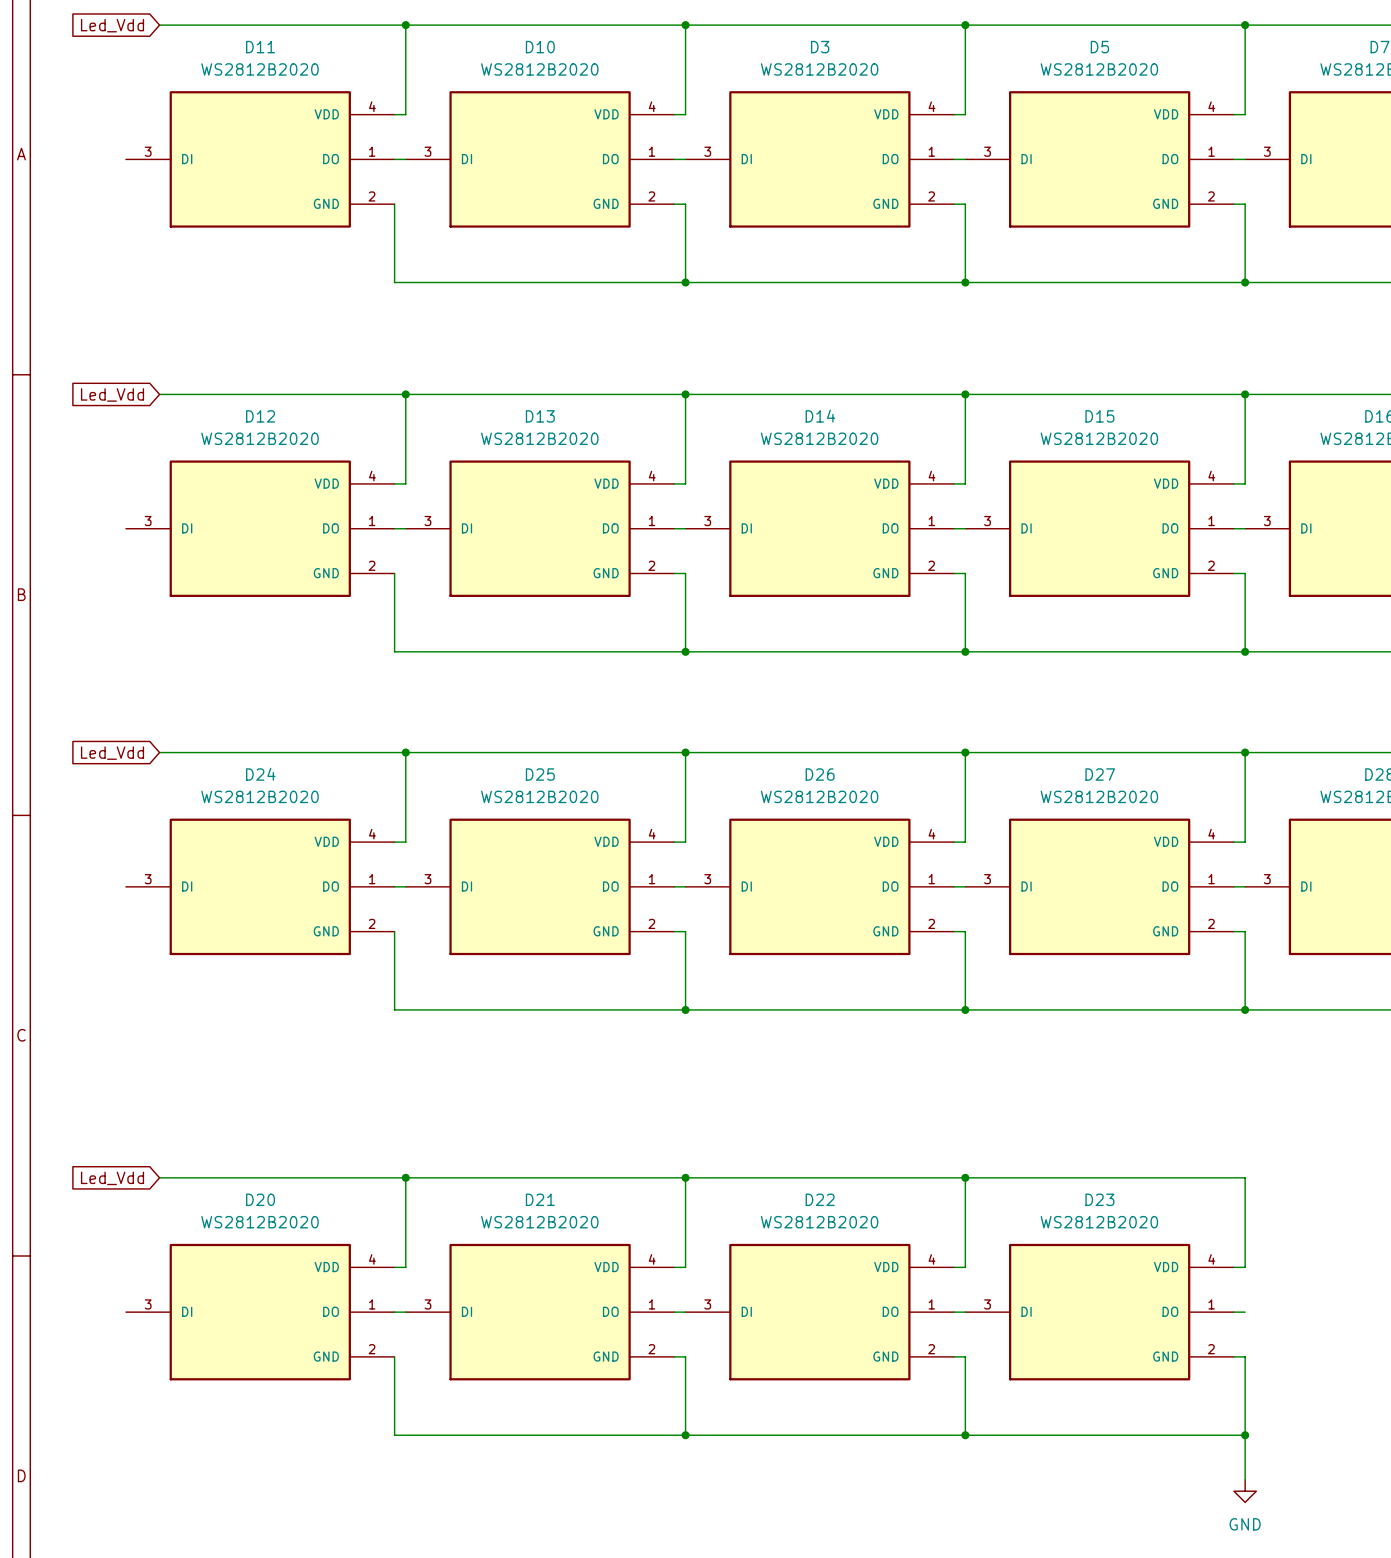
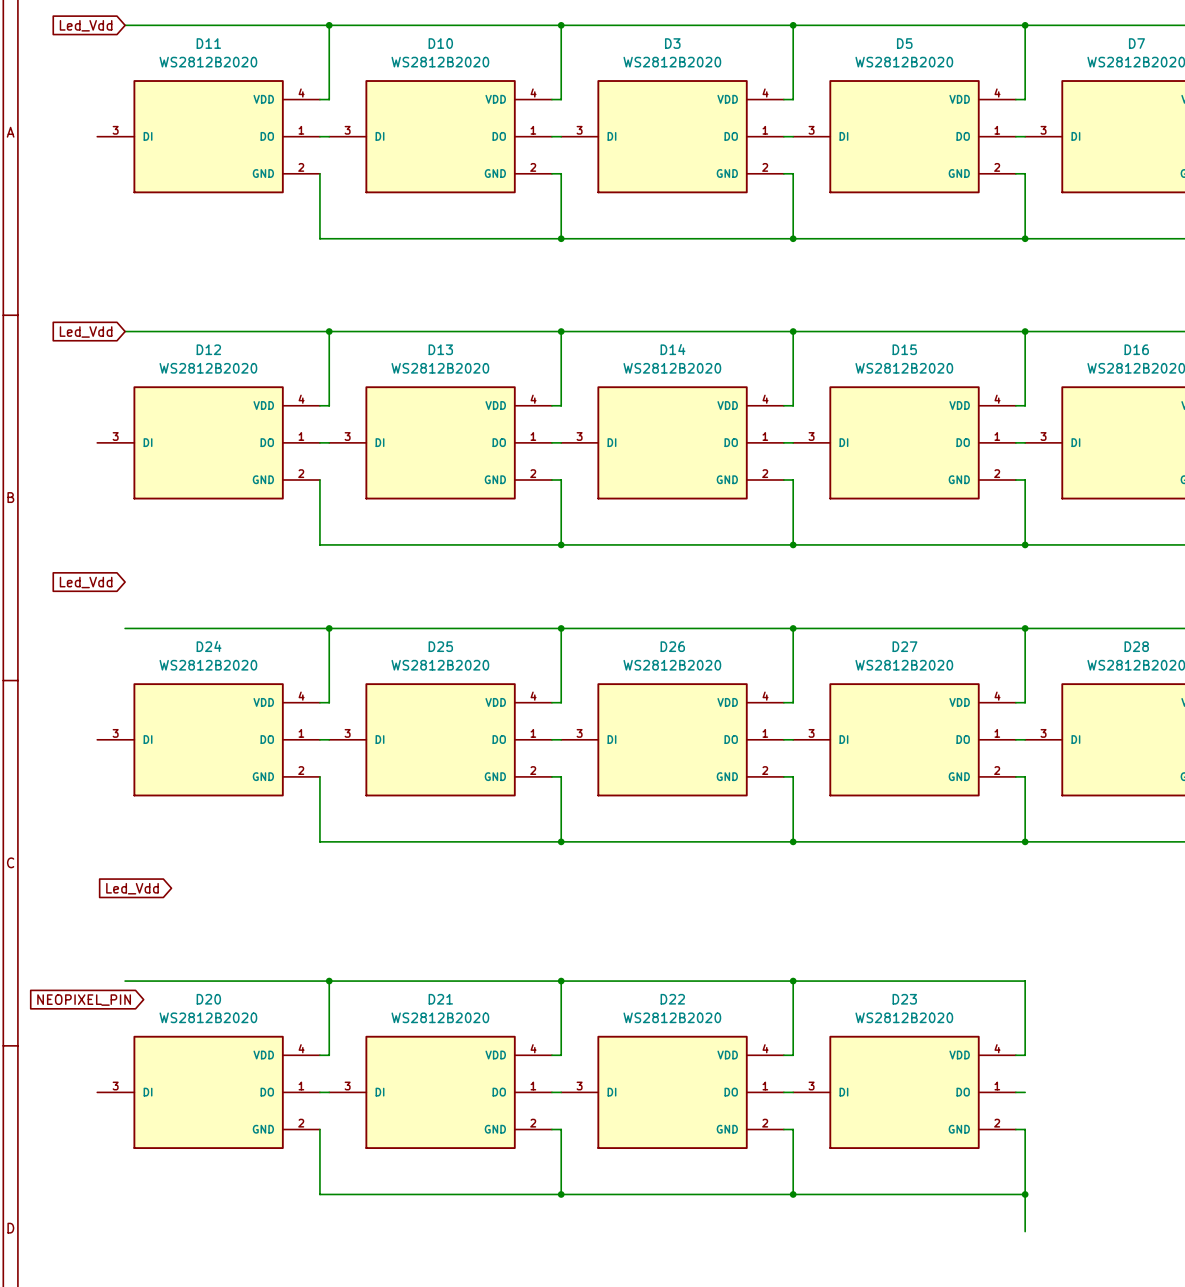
global label position: Led_Vdd (112, 753) -> Led_Vdd (86, 582)
global label position: Led_Vdd (112, 1178) -> Led_Vdd (132, 888)
global label: none -> NEOPIXEL_PIN (84, 1000)
power symbol: GND (1245, 1491) -> none

